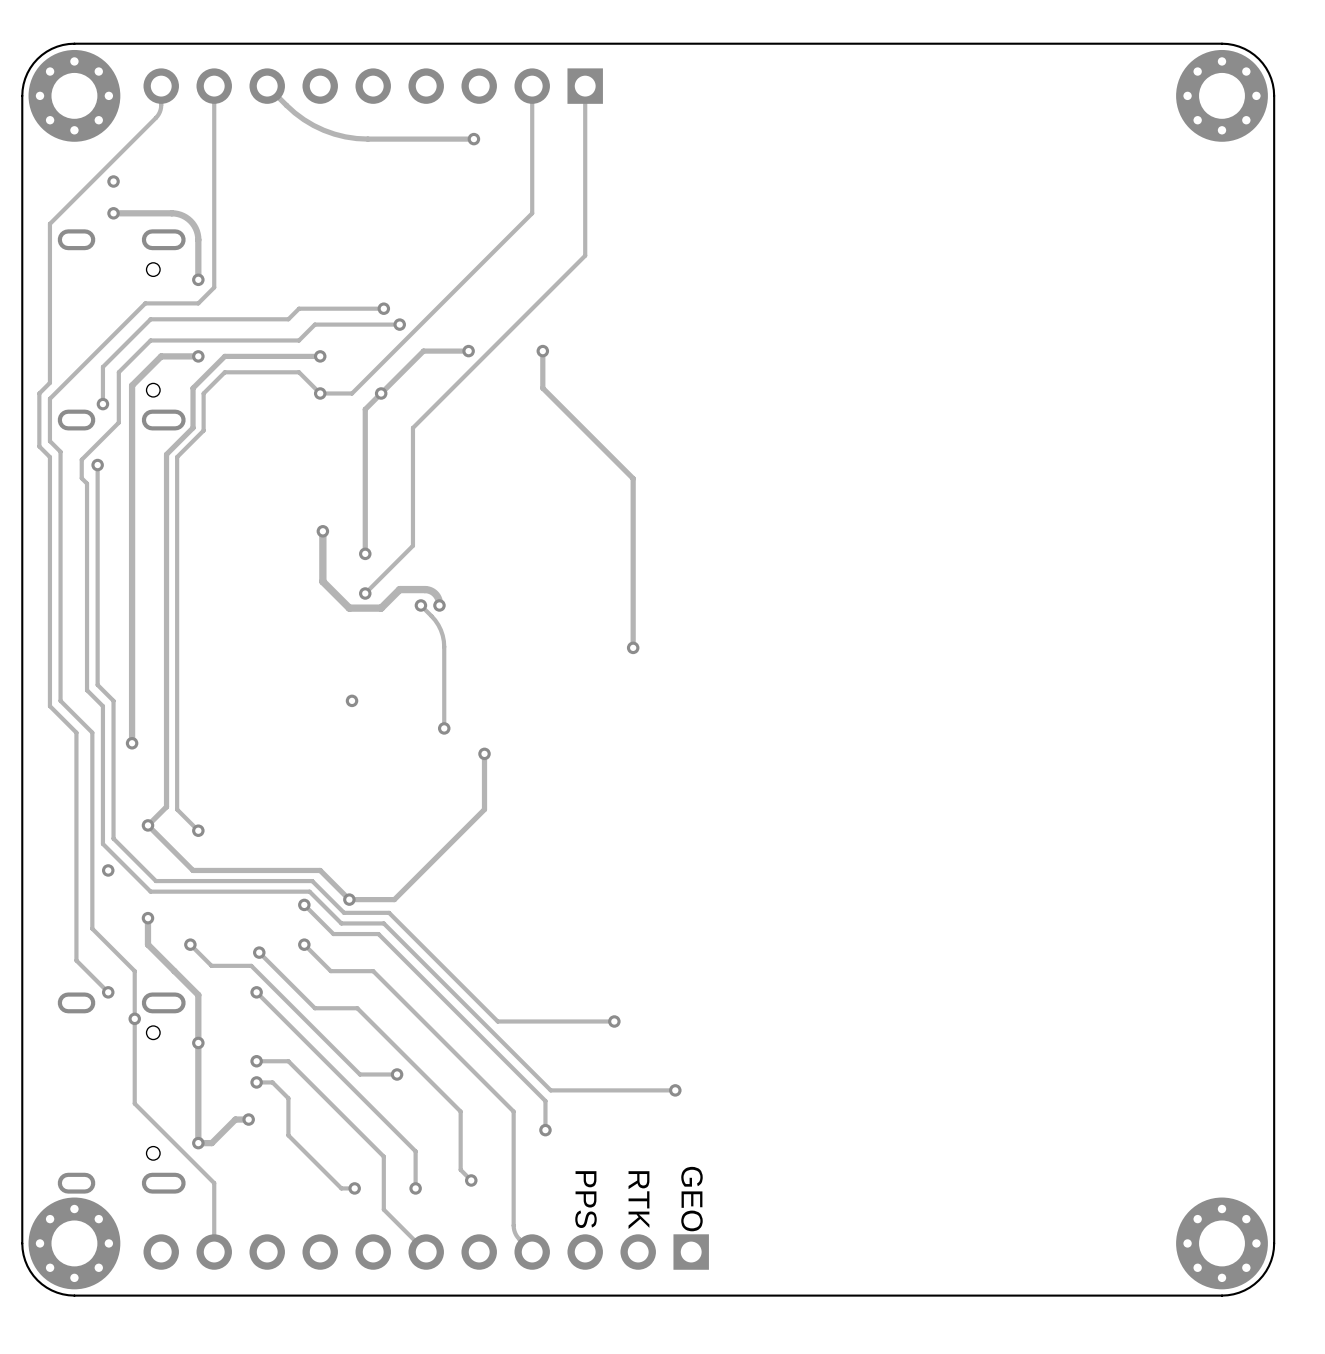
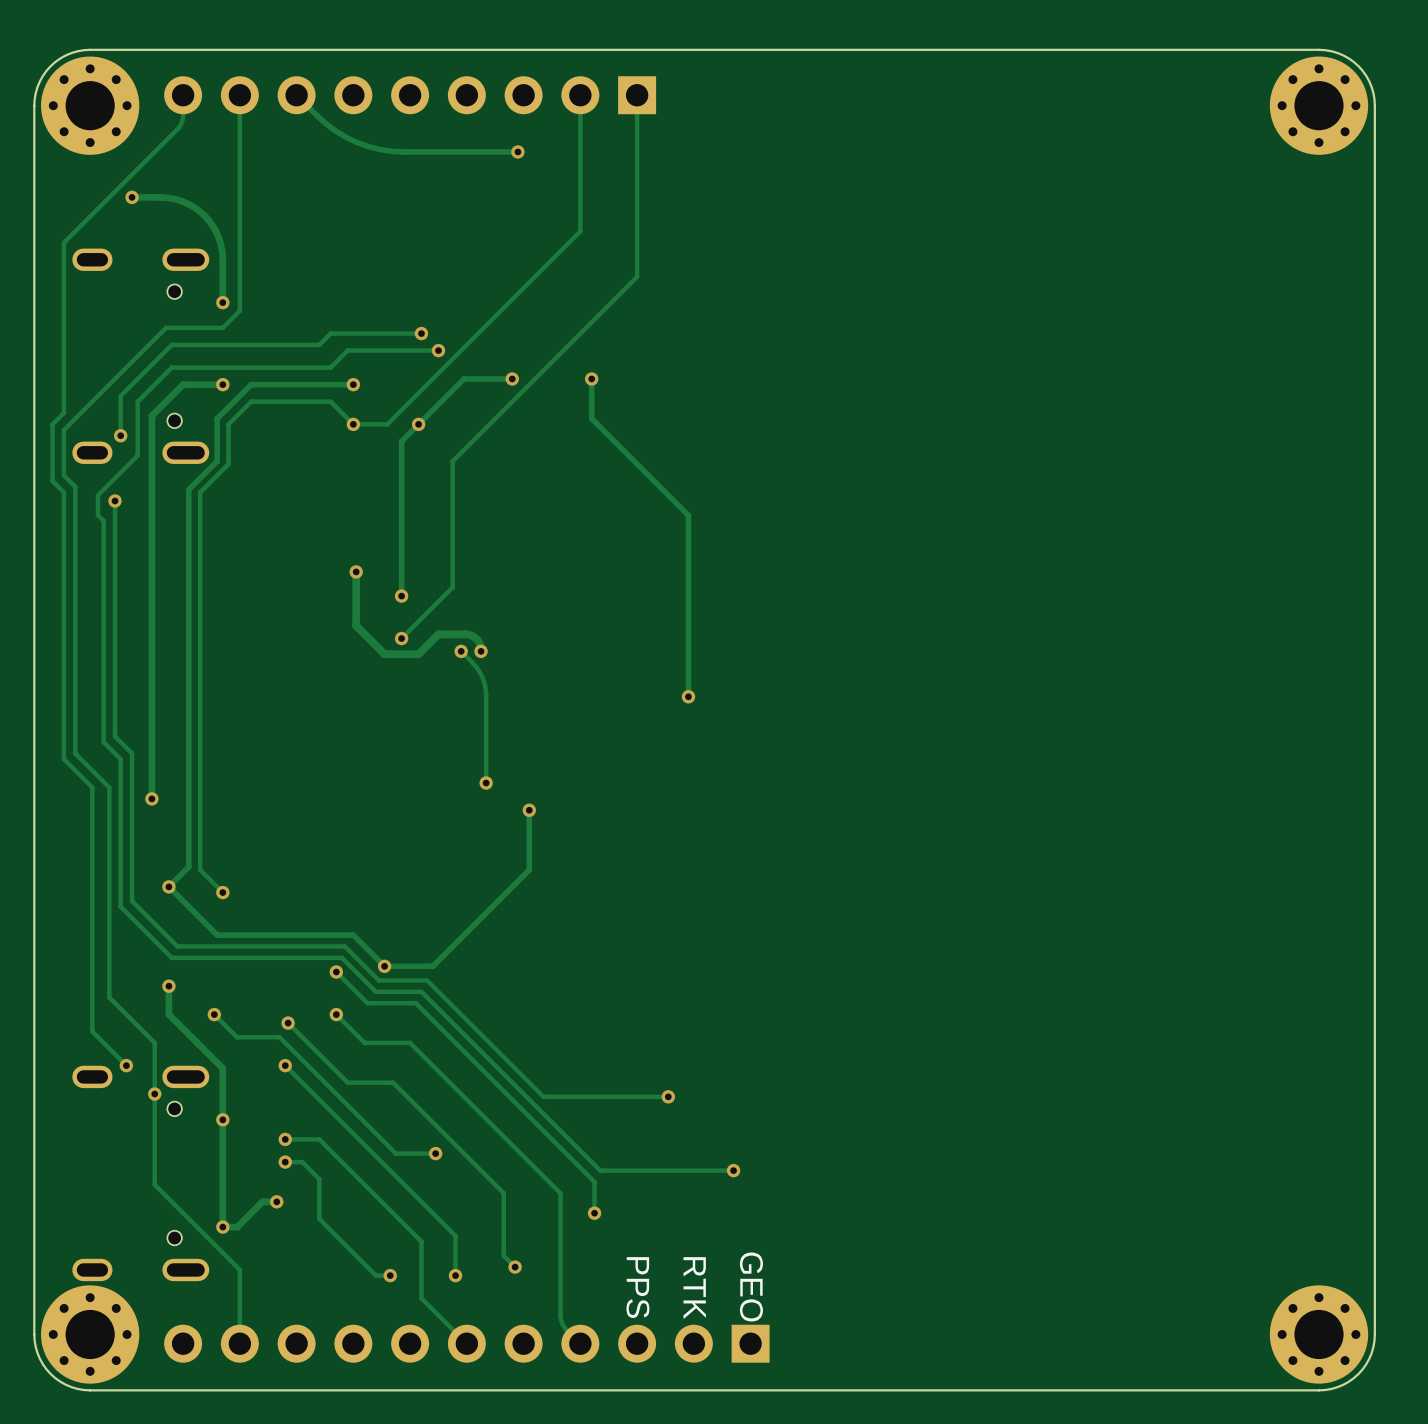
track: (113, 213) (180, 214) (194, 225) (198, 239) -> (132, 197) (168, 197) (184, 202) (198, 210) (209, 221) (218, 235) (222, 259)
via: (113, 213) -> none
via: (352, 700) -> none
via: (108, 870) -> none

